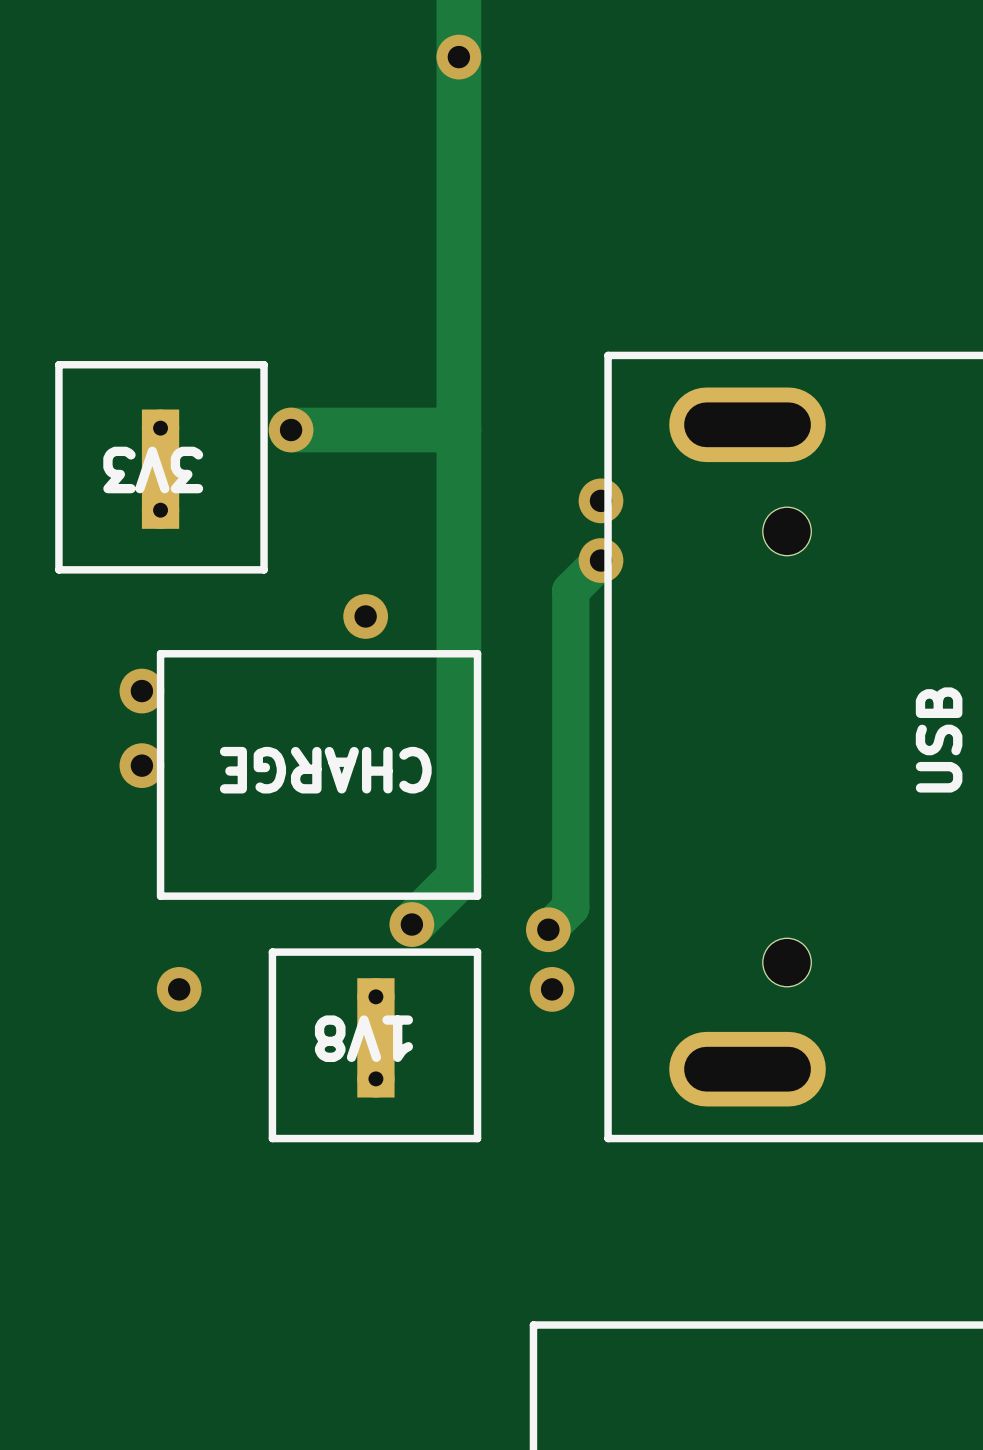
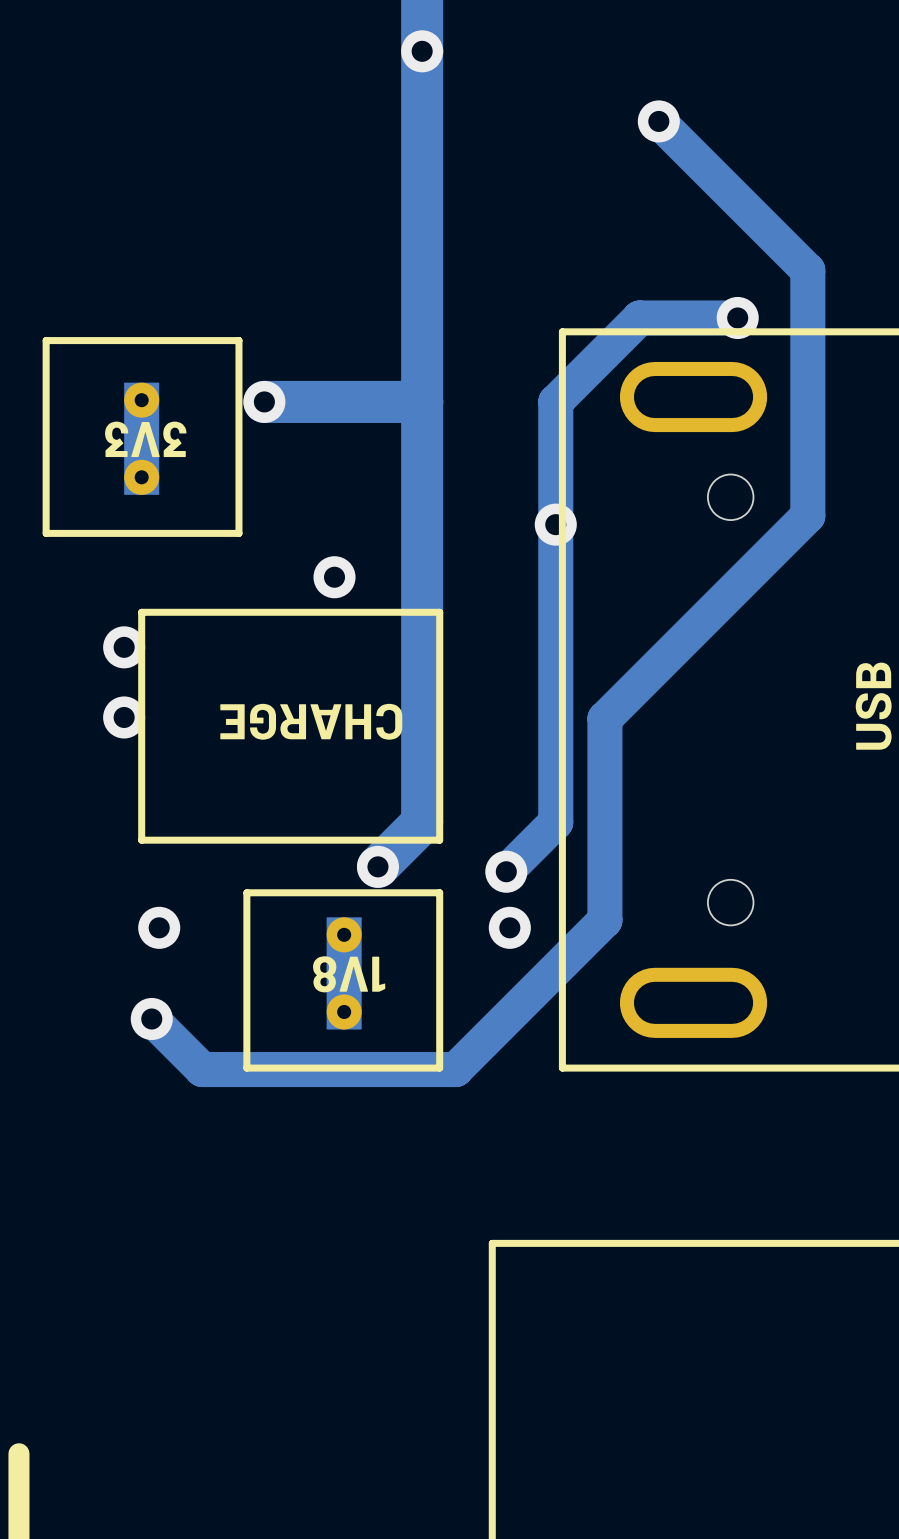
track: none -> (658, 121) (807, 270) (807, 515) (604, 718) (604, 920) (455, 1069) (202, 1069) (151, 1018)
via: none -> (658, 121)
via: none -> (737, 317)
via: (600, 500) -> none
track: (600, 560) (570, 590) (570, 907) -> (737, 317) (639, 317) (555, 401) (555, 822) (527, 850)
via: none -> (151, 1018)

